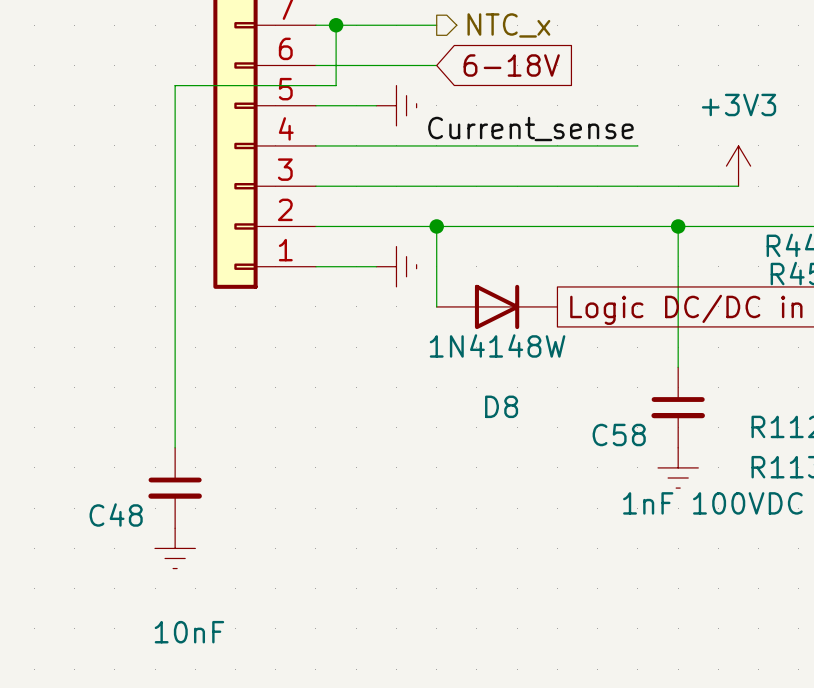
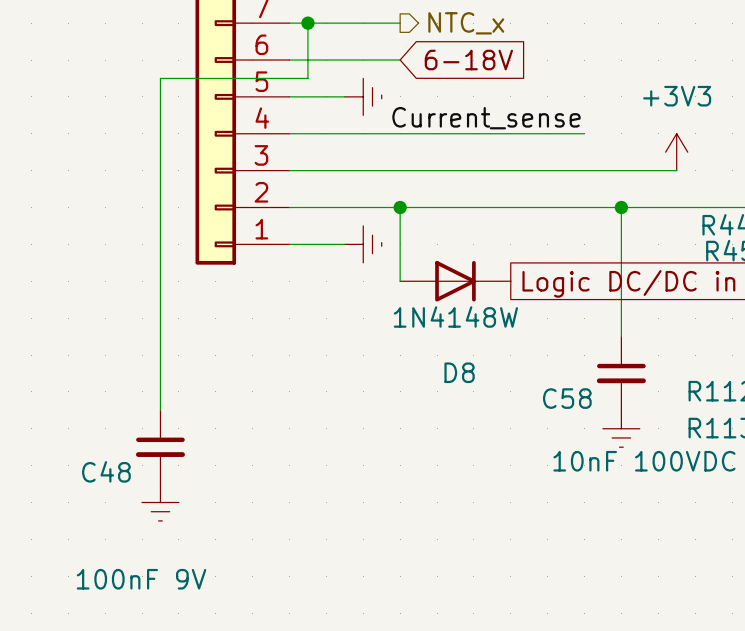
C58 value: 1nF 100VDC (712, 503) -> 10nF 100VDC (644, 461)
C48 value: 10nF (189, 632) -> 100nF 9V (141, 579)

